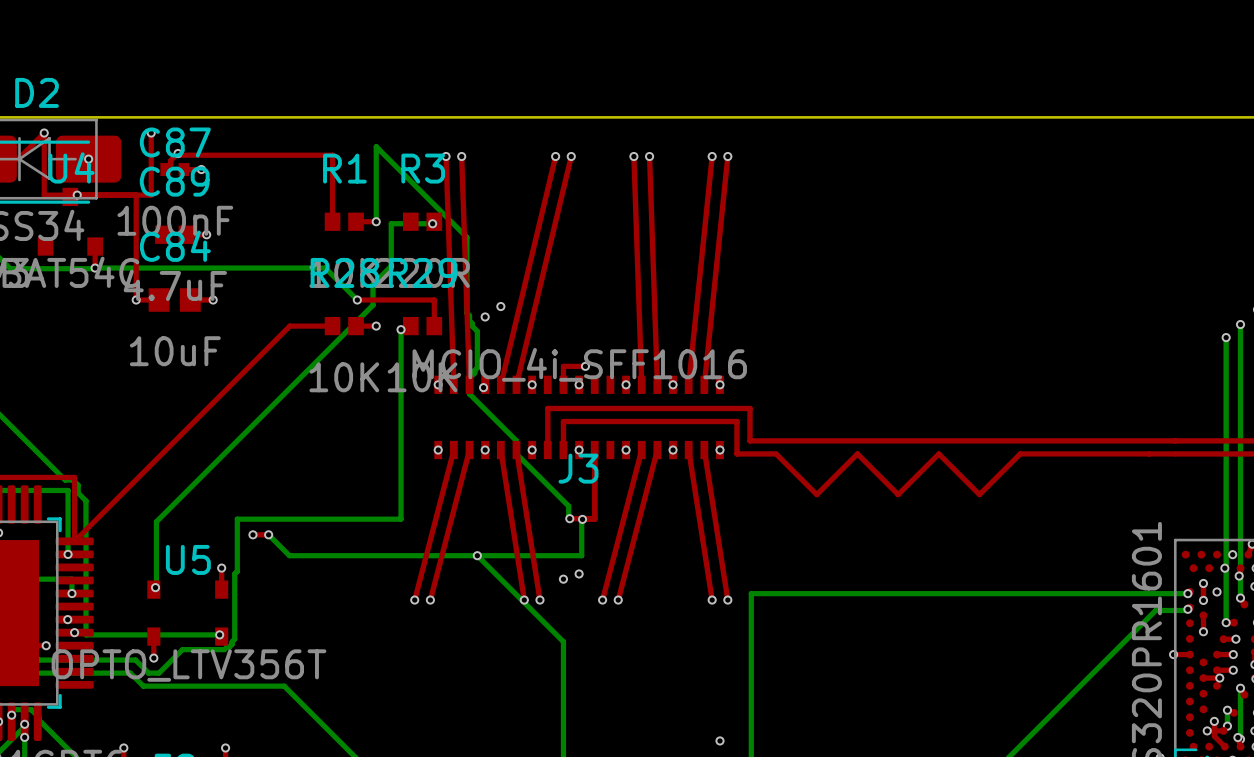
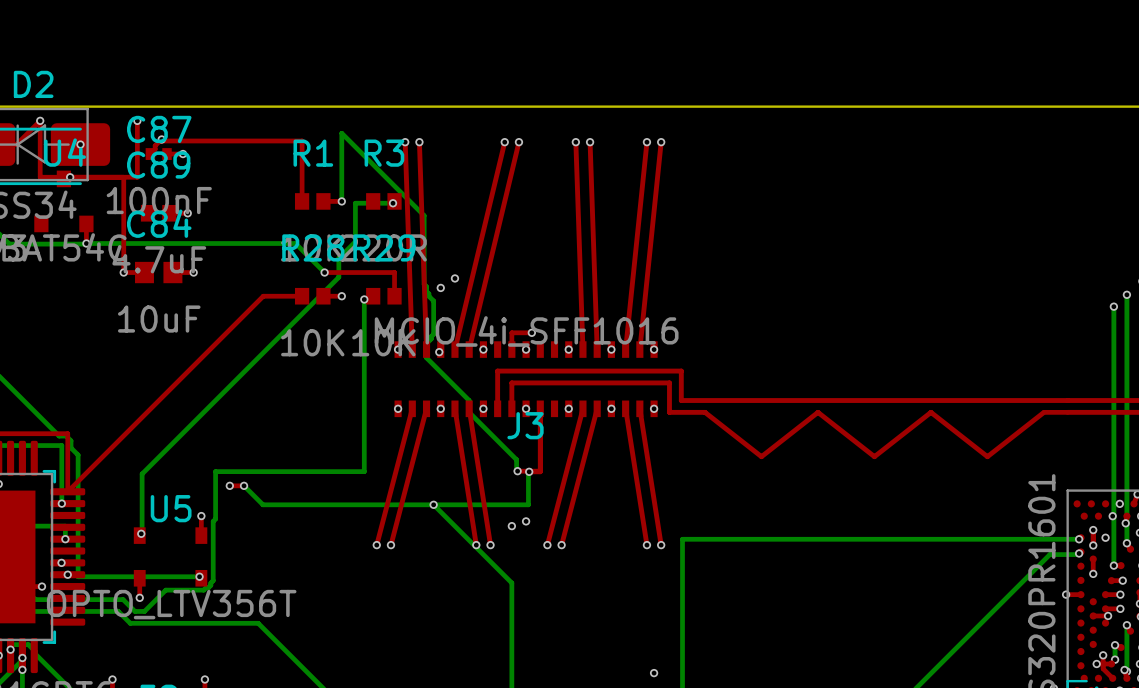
top track: (776, 453) (816, 494) (857, 453) (898, 494) (938, 453) (979, 494) (1020, 453) (1149, 453) -> (705, 412) (761, 456) (818, 412) (874, 456) (930, 412) (987, 456) (1043, 412)

